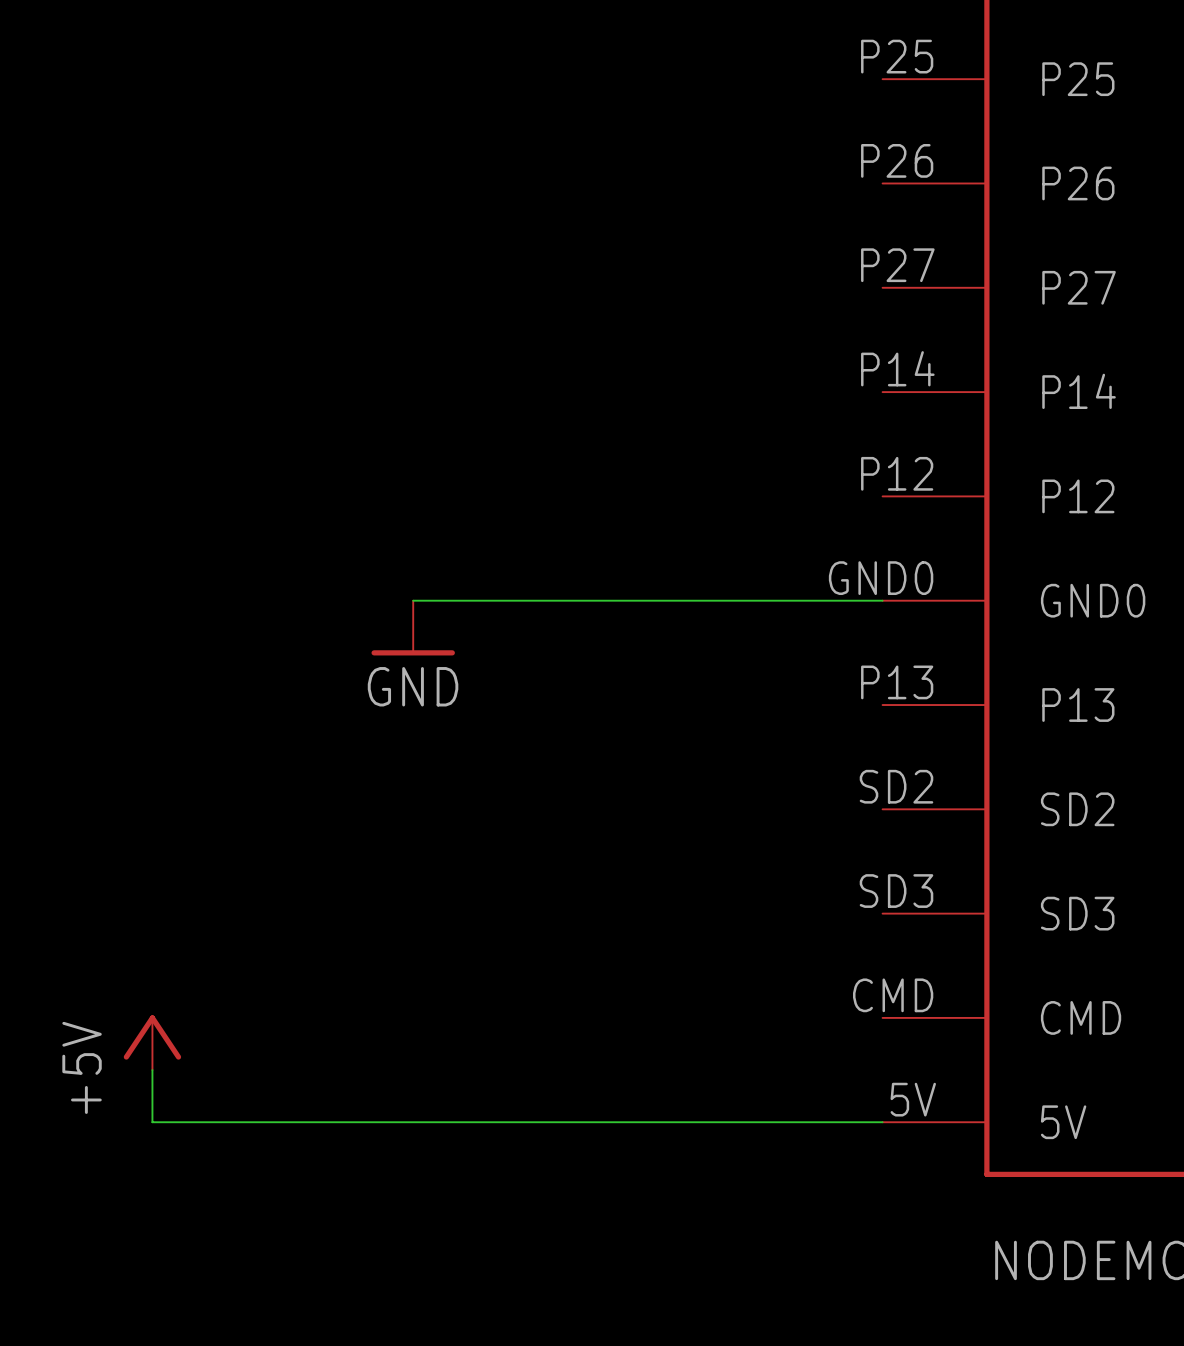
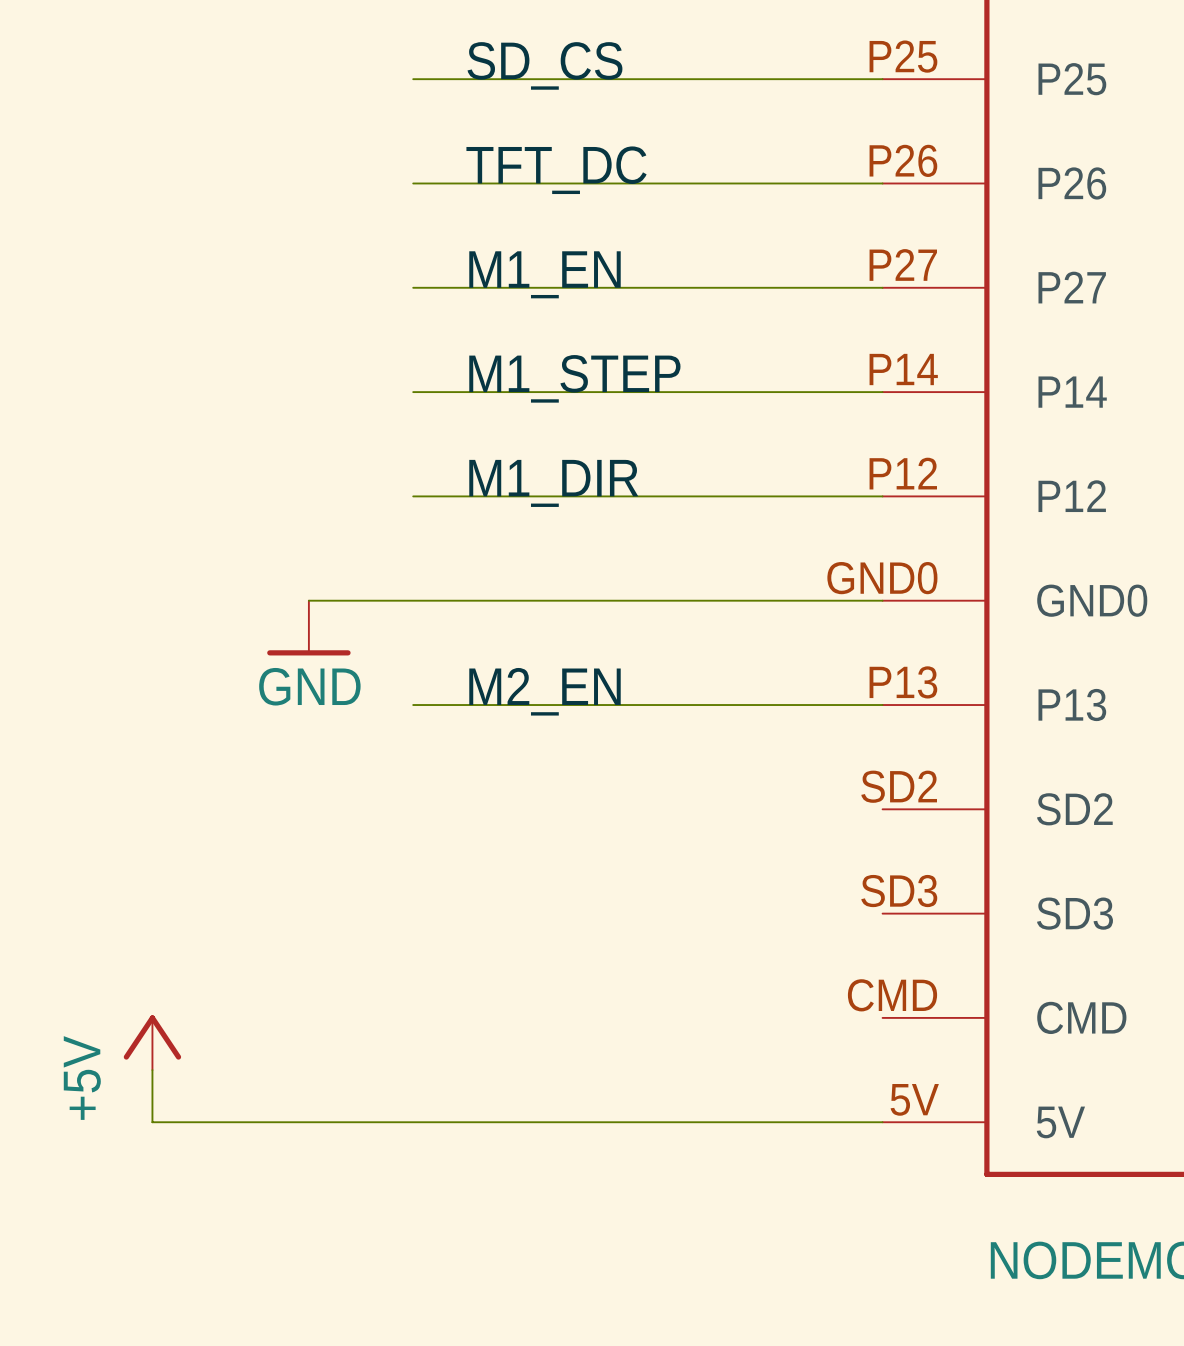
label: none -> SD_CS (544, 65)
wire: none -> (413, 79) (882, 79)
label: none -> TFT_DC (556, 170)
wire: none -> (413, 183) (882, 183)
label: none -> M1_EN (545, 274)
wire: none -> (413, 287) (882, 287)
label: none -> M1_STEP (574, 378)
wire: none -> (413, 392) (882, 392)
label: none -> M1_DIR (553, 483)
wire: none -> (413, 496) (882, 496)
wire: none -> (308, 600) (413, 600)
power symbol position: GND (413, 628) -> GND (308, 628)
label: none -> M2_EN (545, 691)
wire: none -> (413, 705) (882, 705)

